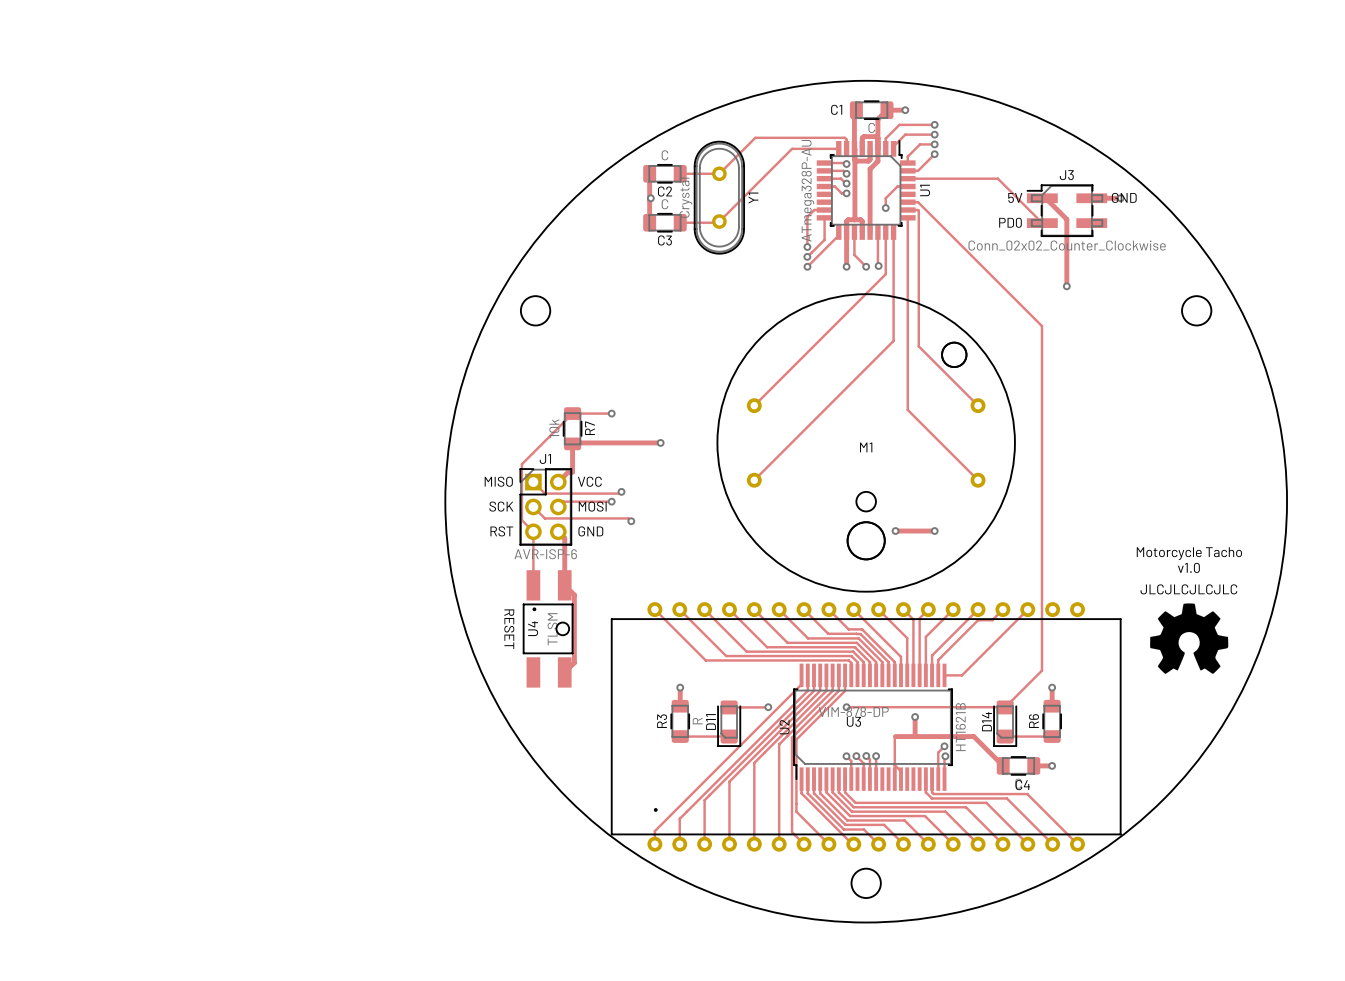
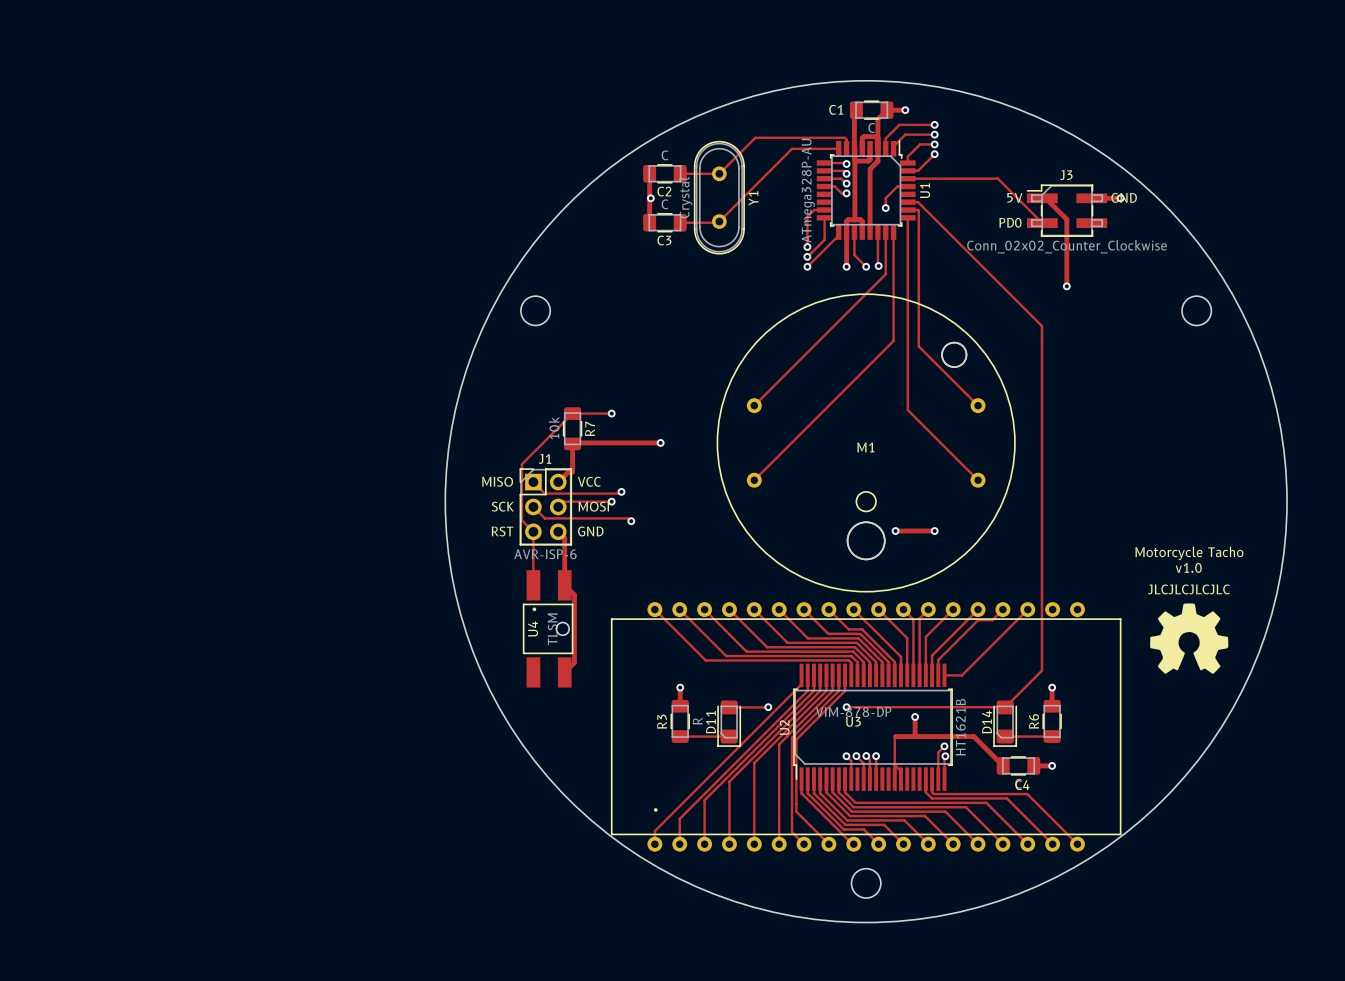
text: RESET (509, 629) -> none

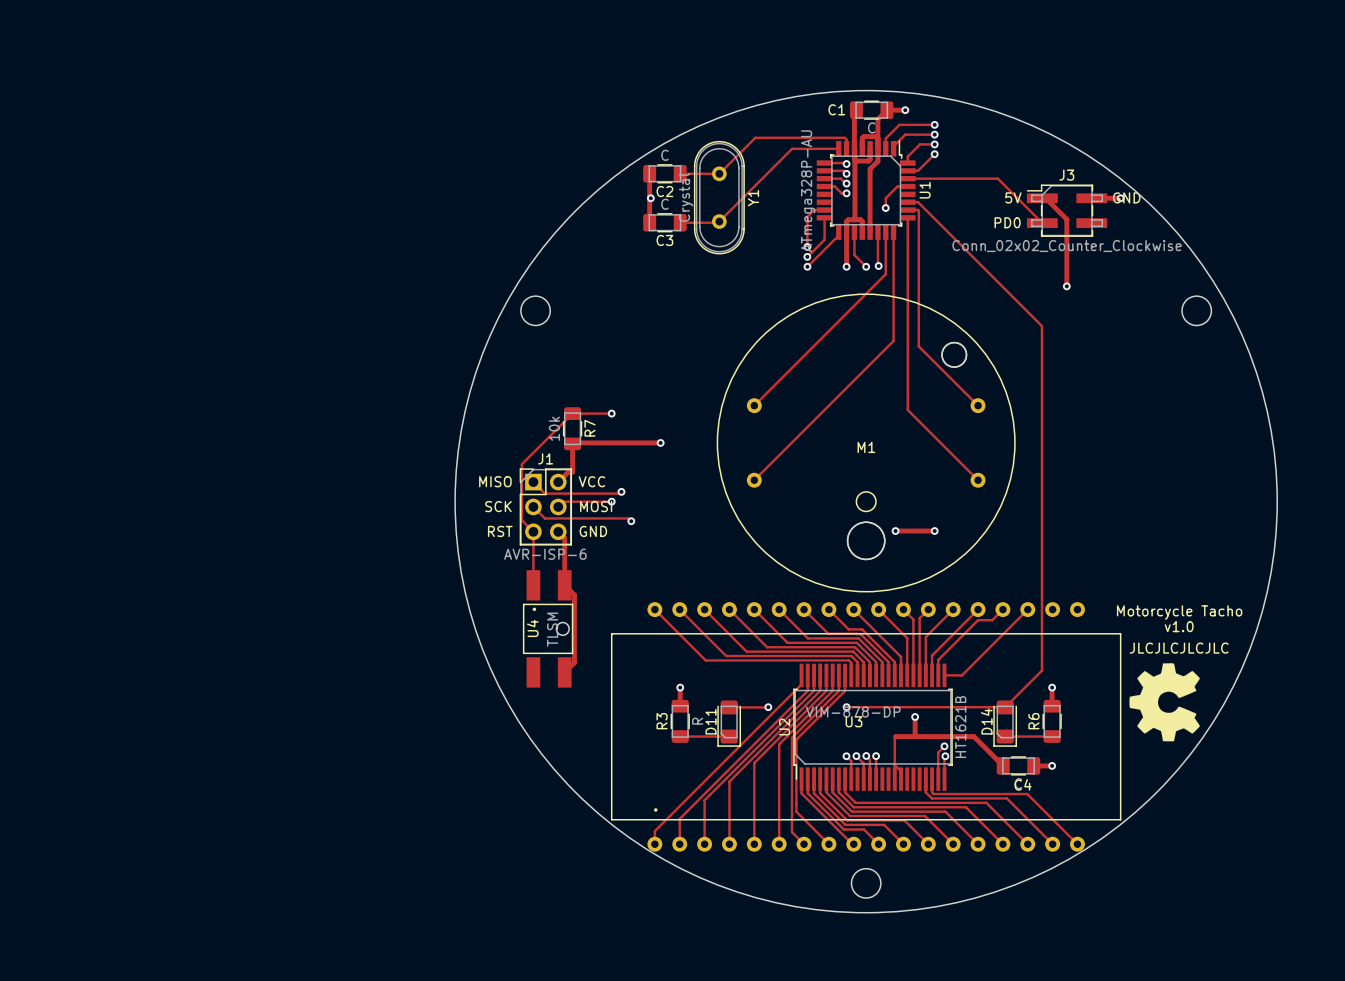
round board edge size: [444, 80, 1288, 924] -> [454, 89, 1278, 914]
text position: Motorcycle Tacho (1189, 553) -> Motorcycle Tacho (1179, 612)
text position: v1.0 (1188, 567) -> v1.0 (1179, 626)
text position: JLCJLCJLCJLC (1188, 589) -> JLCJLCJLCJLC (1179, 648)
U3 footprint: [610, 602, 1122, 852] -> [610, 602, 1122, 852]
drawing: [1150, 603, 1229, 674] -> none
drawing: none -> [1129, 663, 1200, 742]

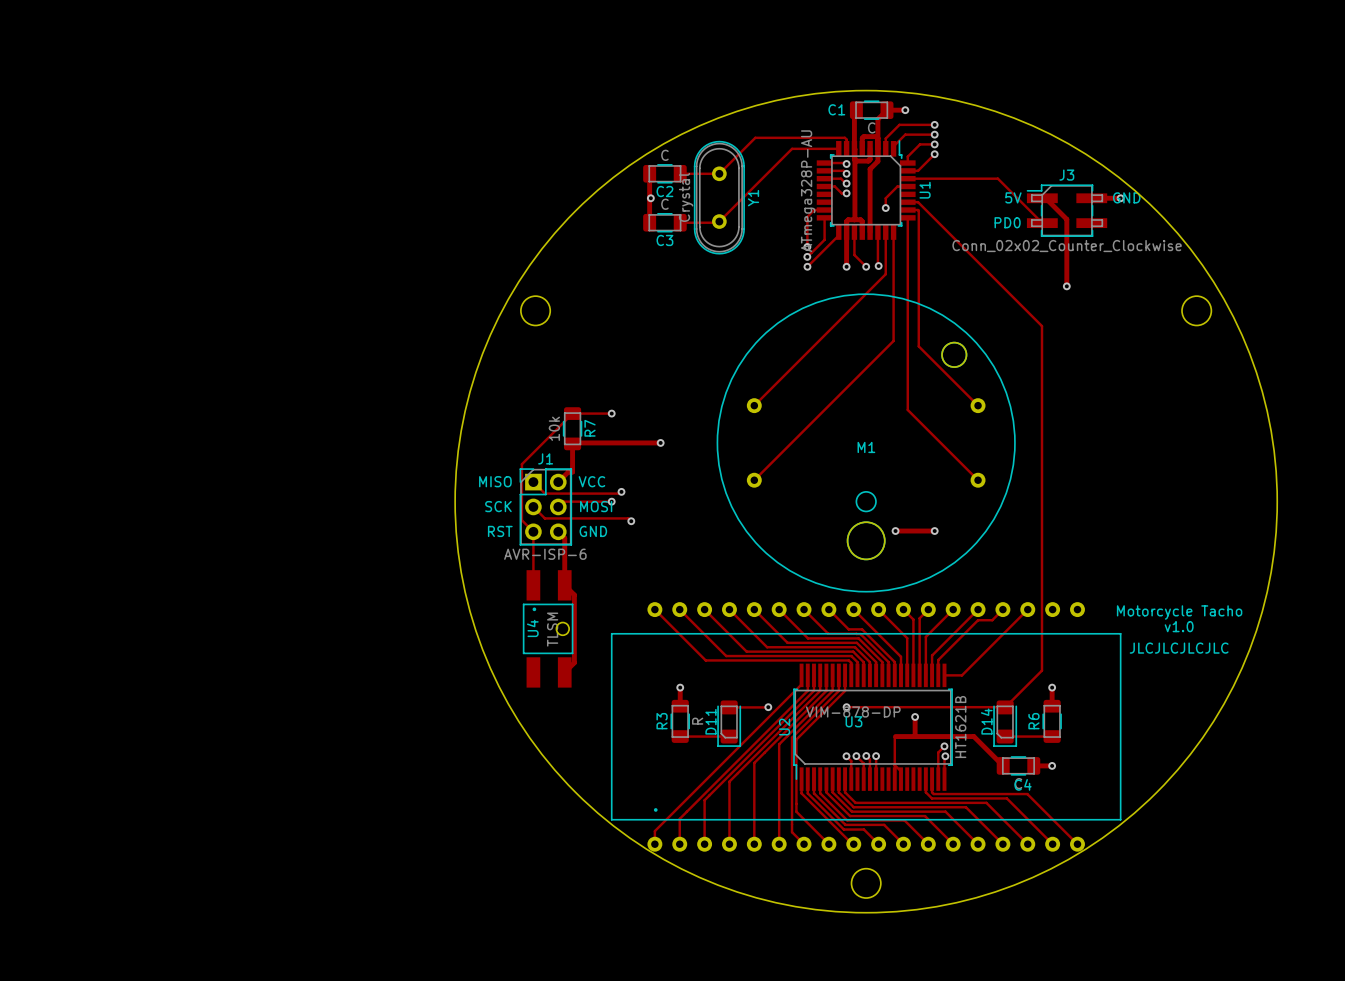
drawing: [1129, 663, 1200, 742] -> none

